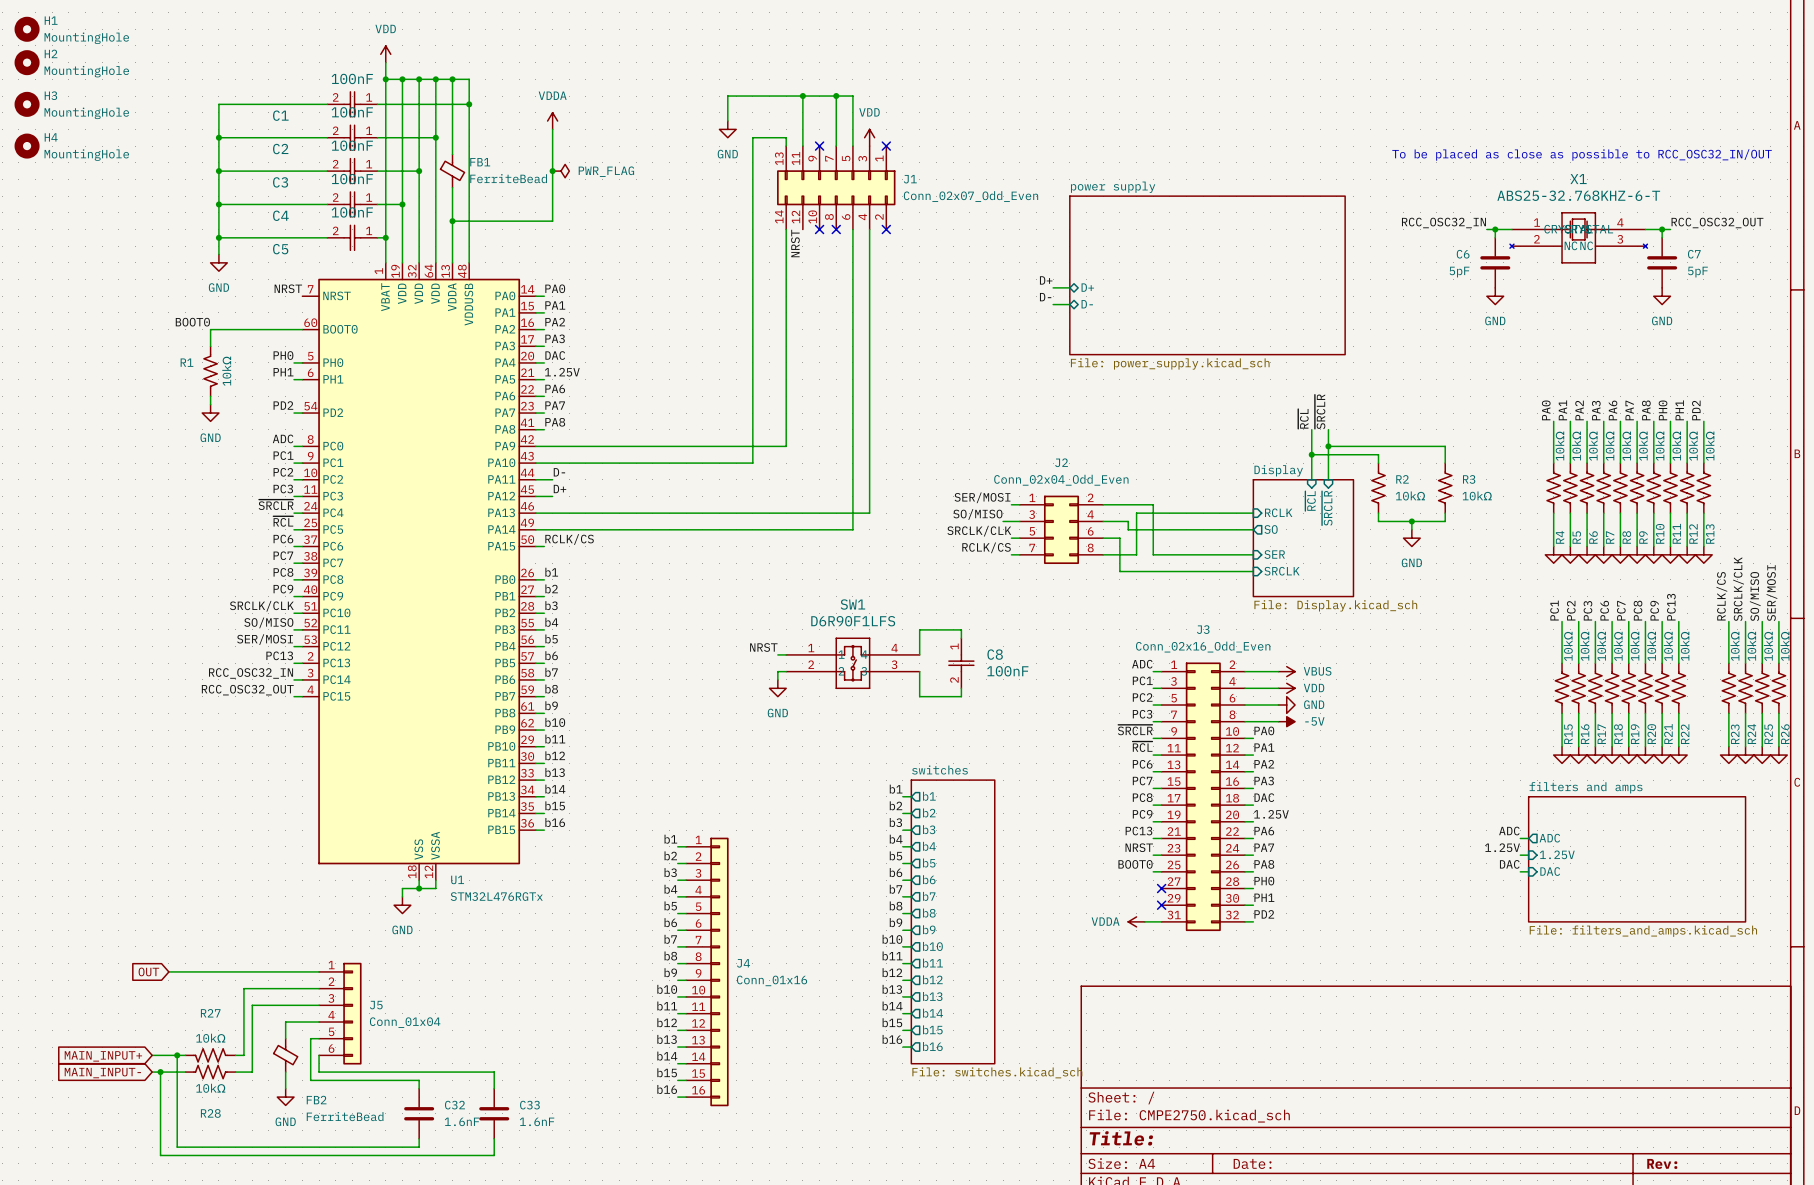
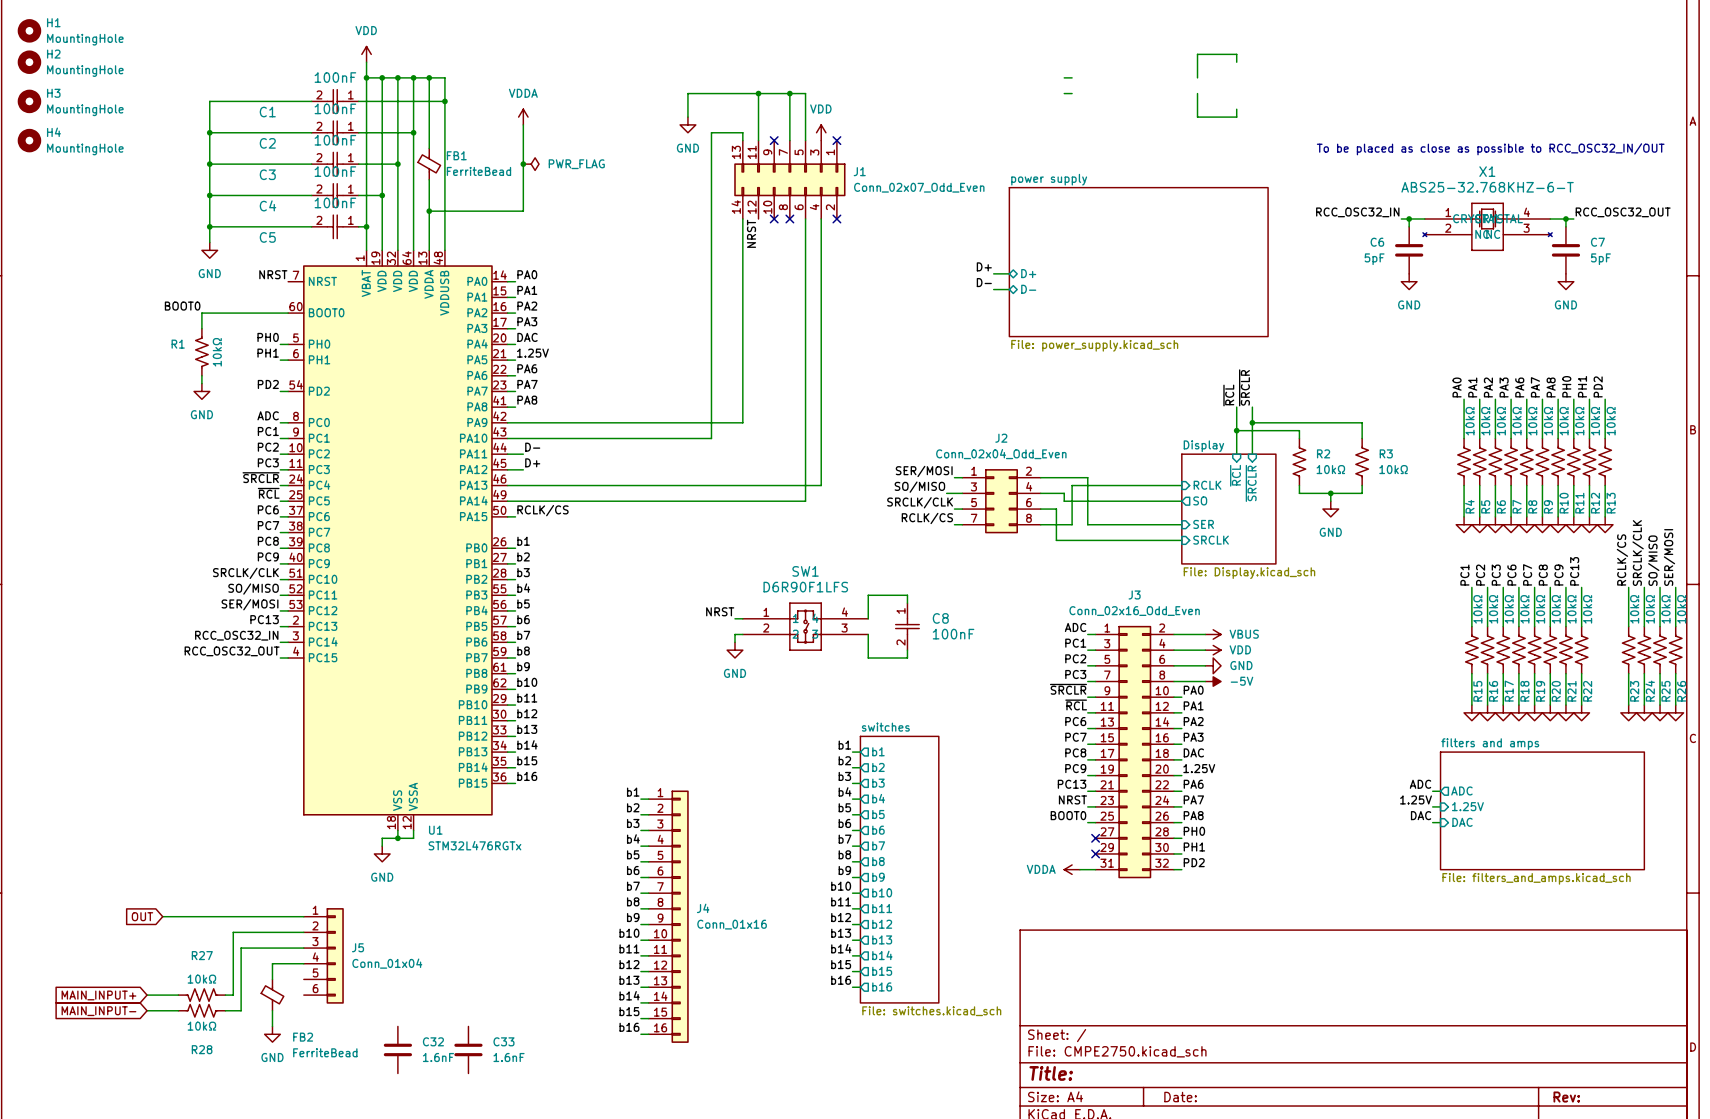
wire: none -> (1236, 62) (1236, 54) (1197, 54) (1197, 77)
wire: none -> (1064, 77) (1072, 77)
wire: none -> (1064, 93) (1072, 93)
wire: none -> (1197, 93) (1197, 117) (1236, 117) (1236, 109)
wire: (319, 1038) (310, 1038) (310, 1080) (419, 1080) (419, 1088) -> none
wire: (177, 1055) (177, 1147) (419, 1147) (419, 1138) -> none
junction: (177, 1055) -> none
wire: (319, 1055) (319, 1072) (494, 1072) (494, 1088) -> none
wire: (160, 1072) (160, 1155) (494, 1155) (494, 1138) -> none
junction: (160, 1072) -> none

